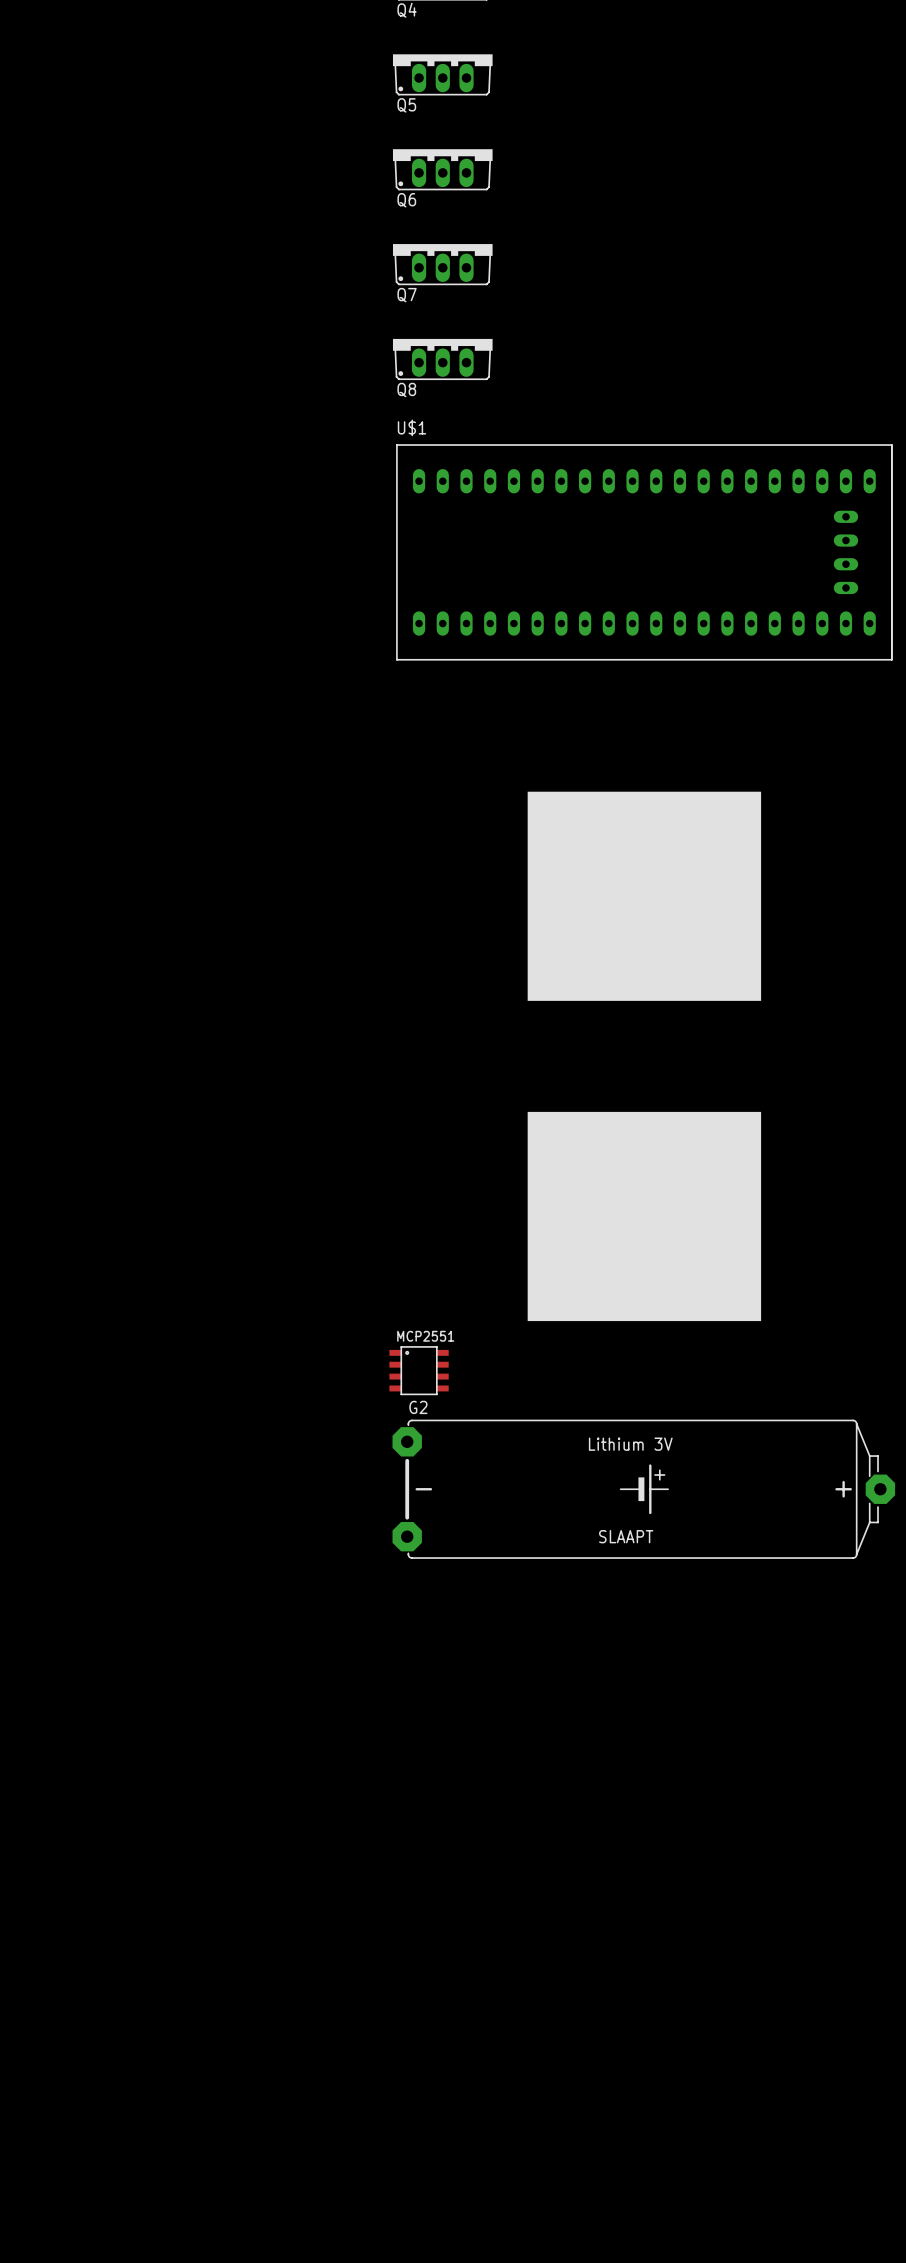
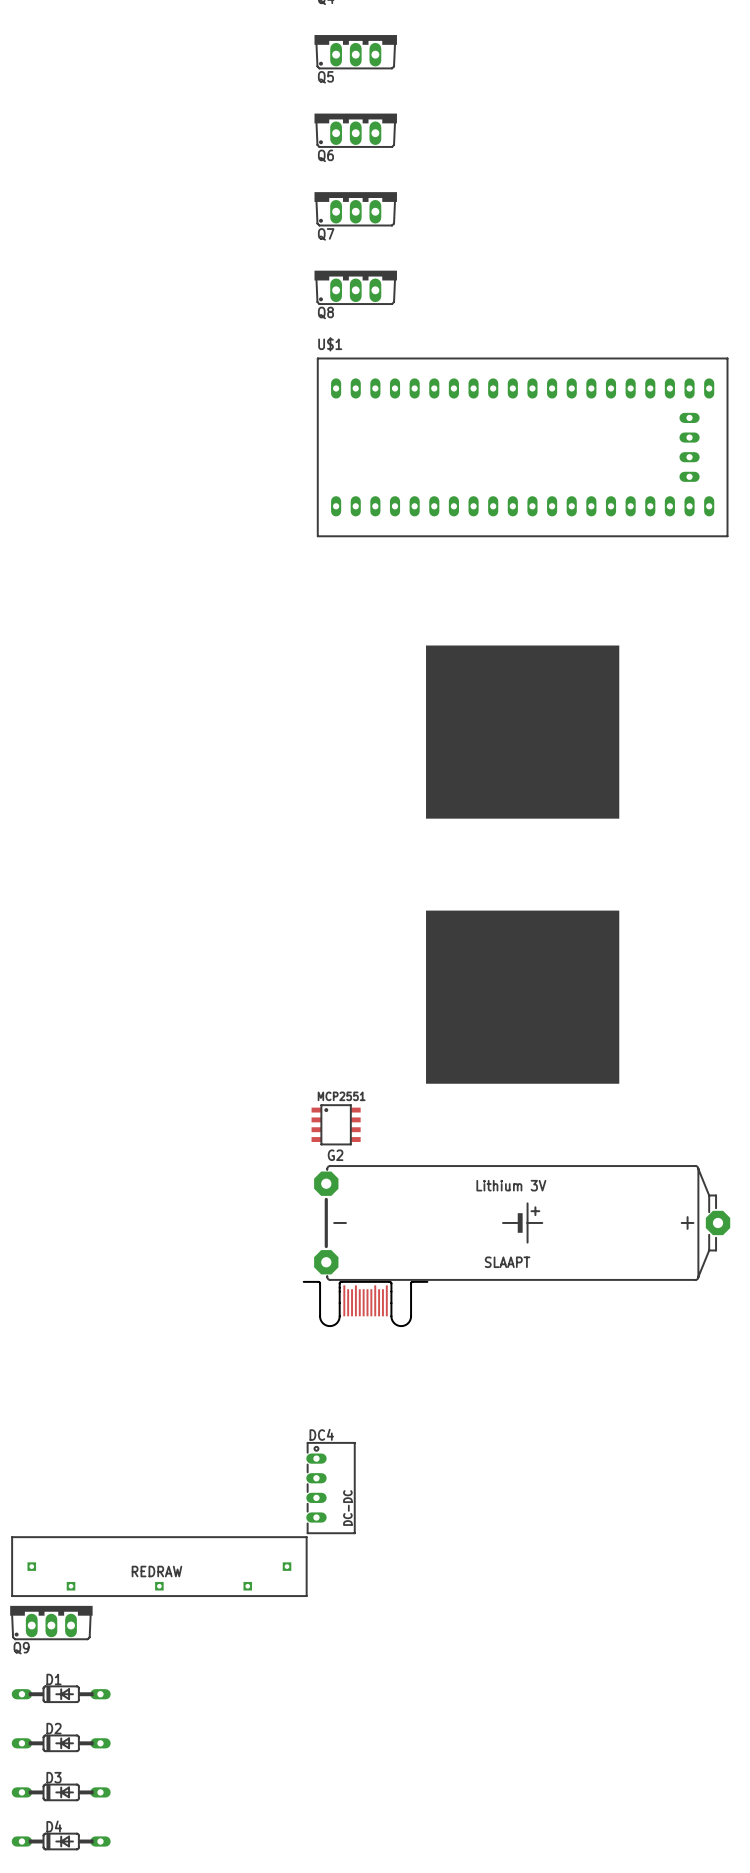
part: none -> (365, 1304)
DC4: none -> (330, 1488)
part: none -> (159, 1566)
Q9: none -> (51, 1622)
D1: none -> (61, 1694)
D2: none -> (61, 1743)
D3: none -> (61, 1792)
D4: none -> (61, 1841)

